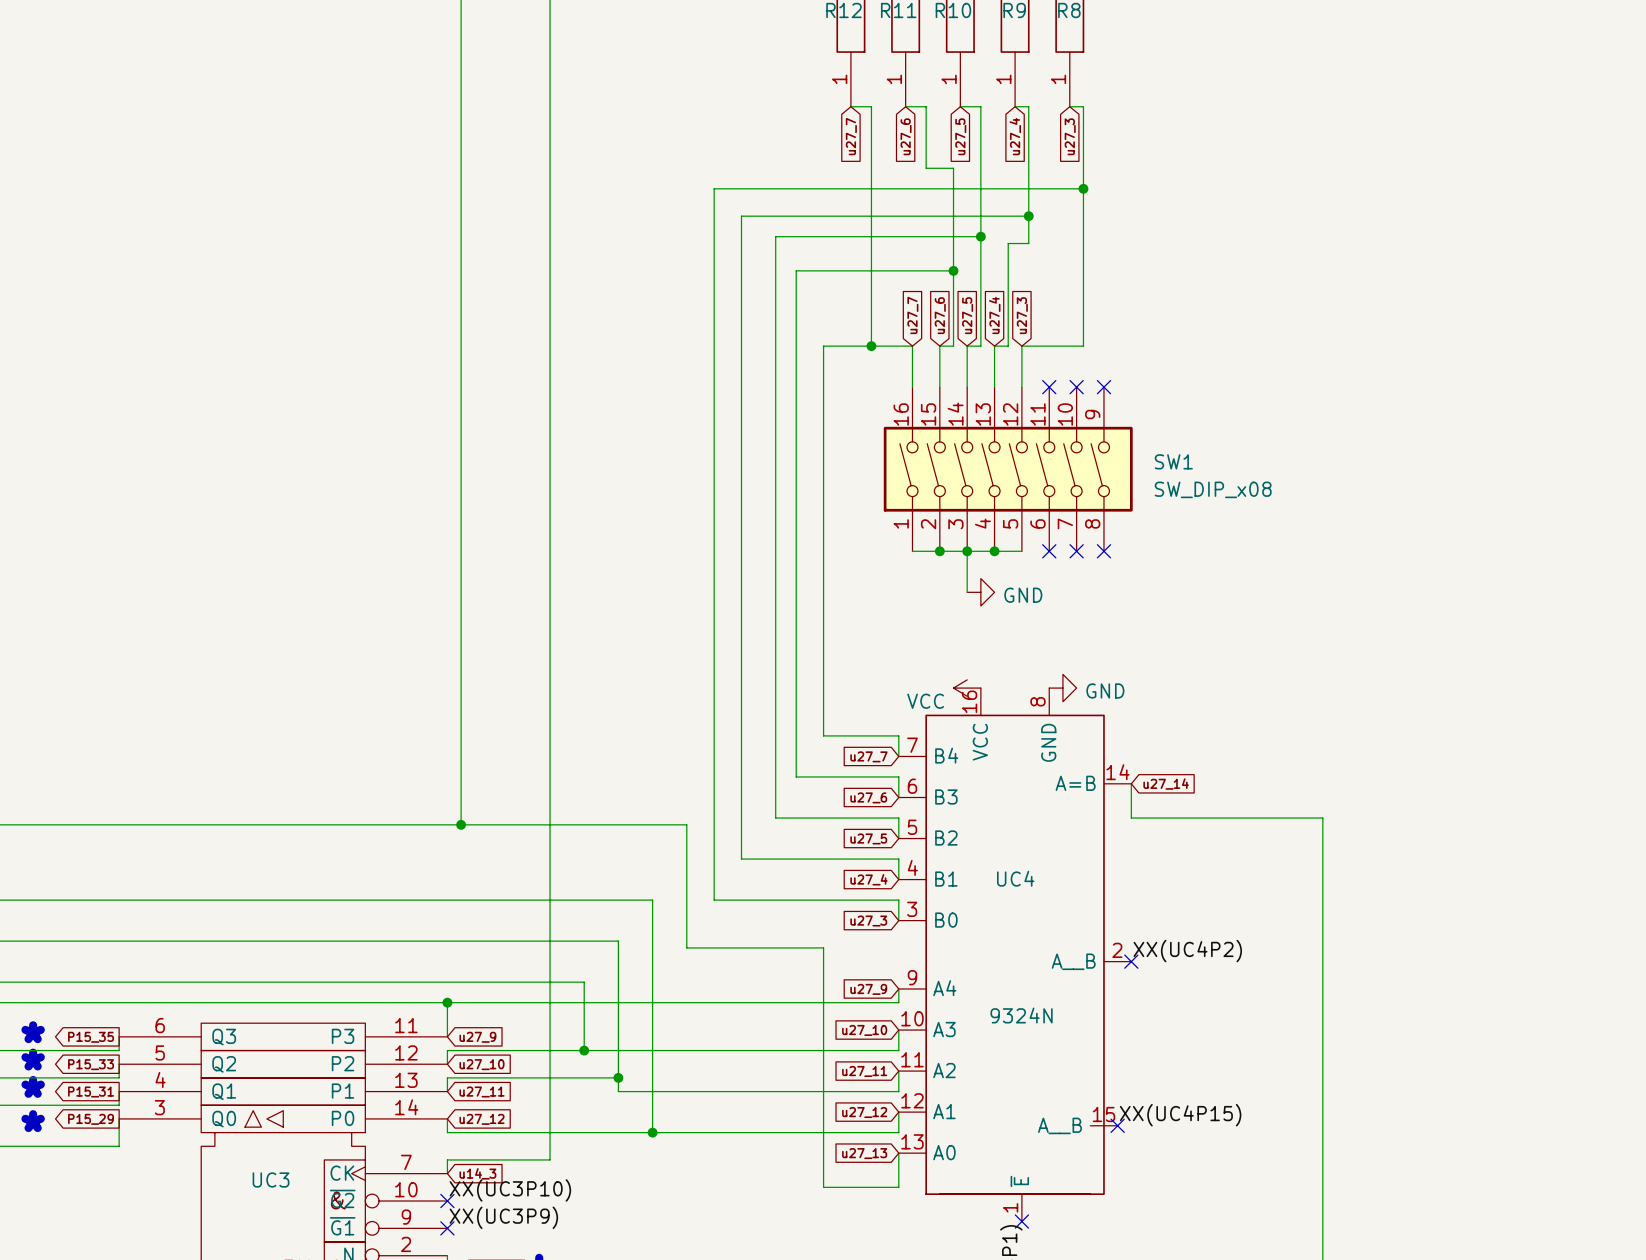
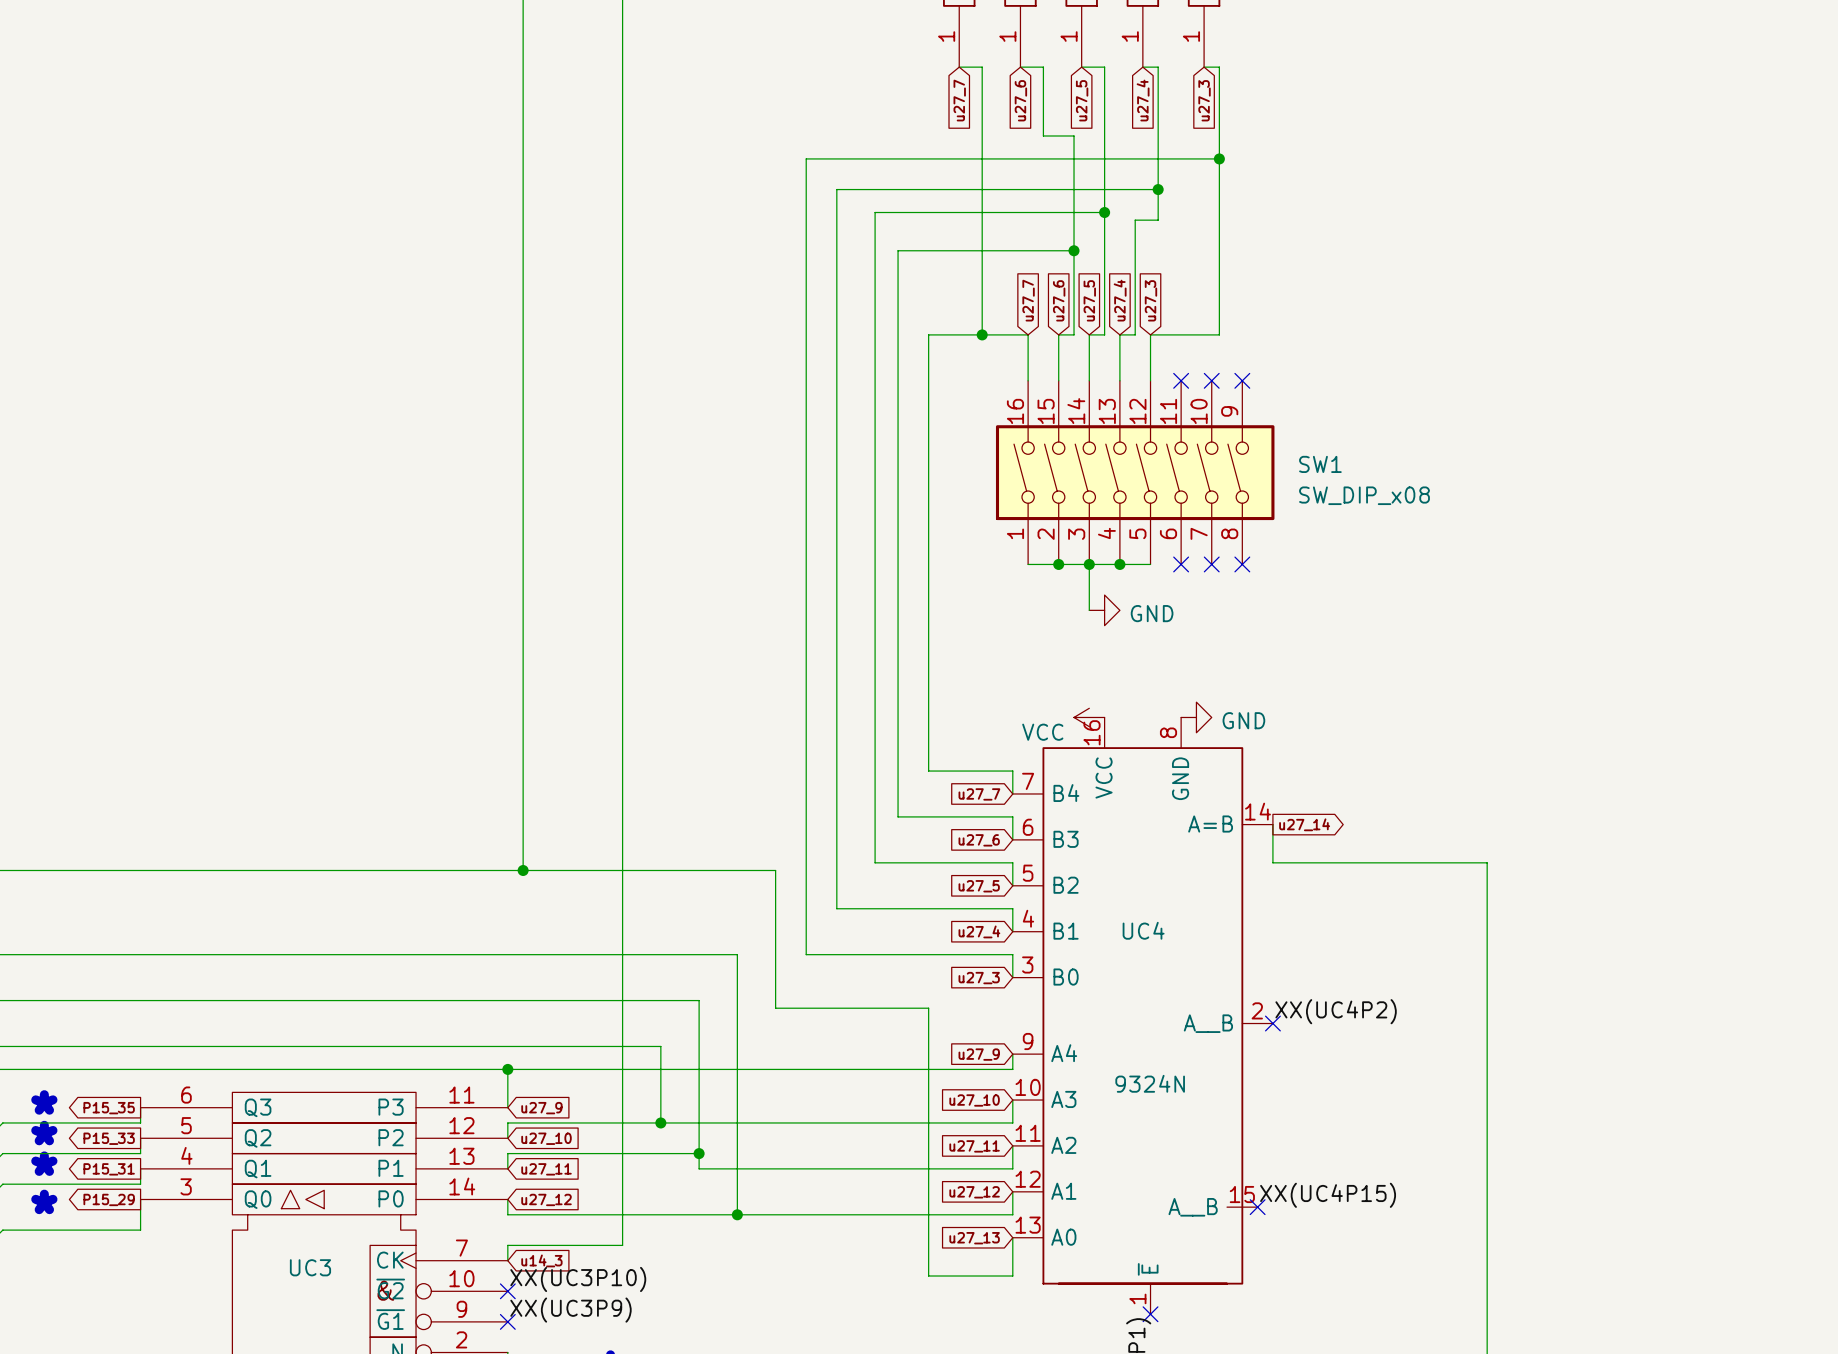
global label shape: input (1166, 784) -> output (1304, 824)

